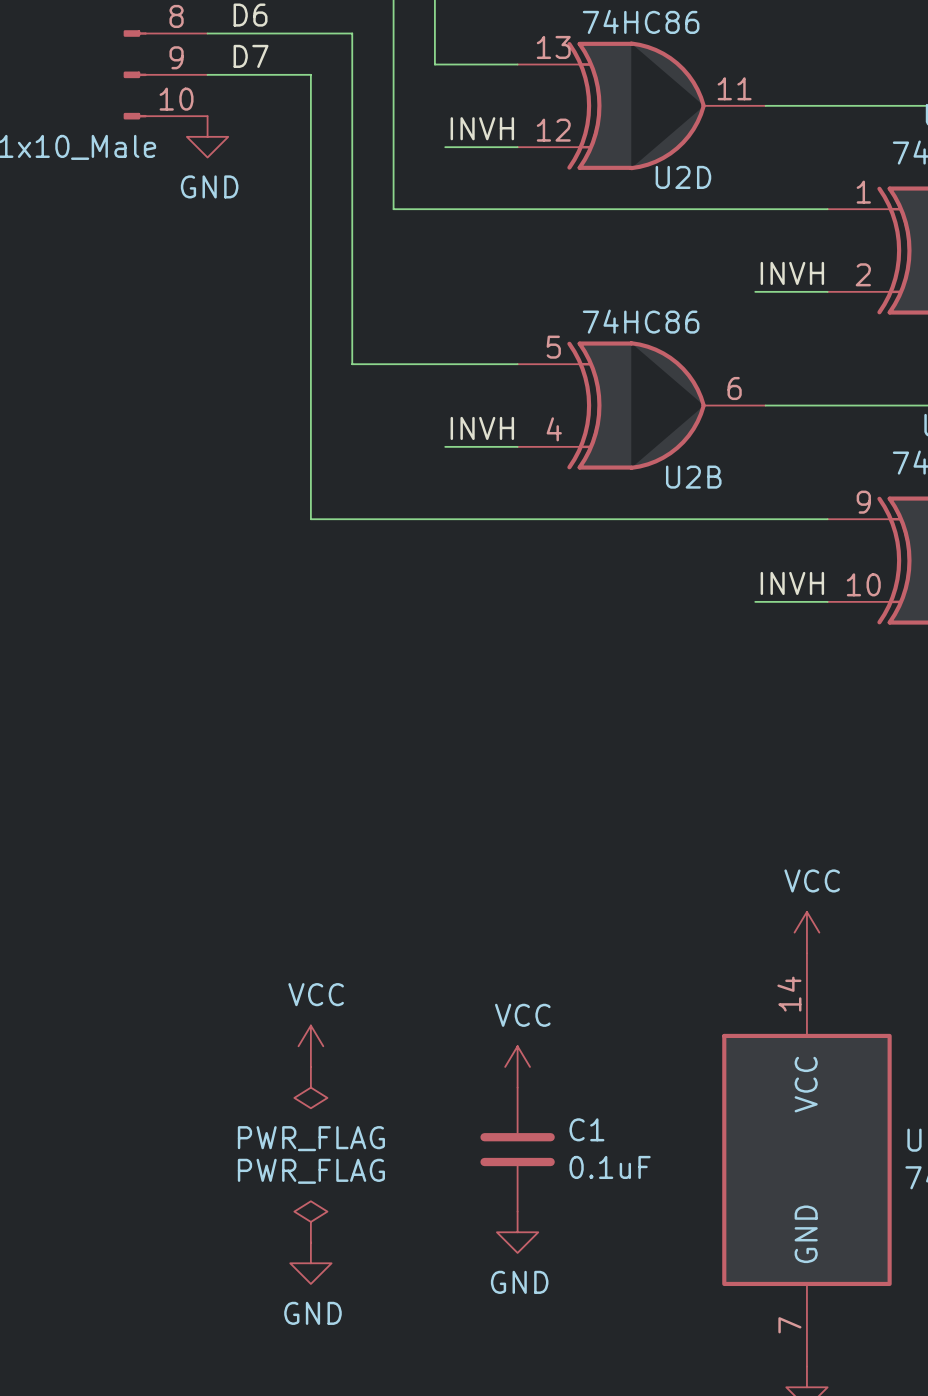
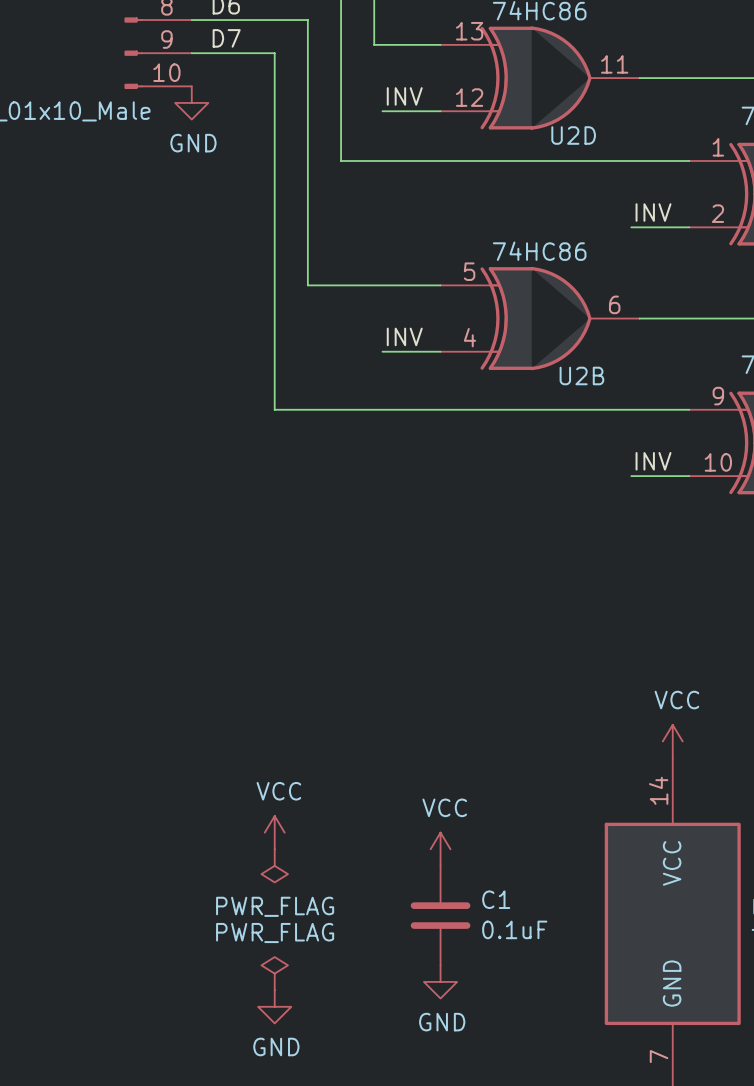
label: INVH (482, 128) -> INV (404, 96)
label: INVH (792, 273) -> INV (653, 212)
label: INVH (482, 428) -> INV (404, 336)
label: INVH (792, 583) -> INV (653, 461)

